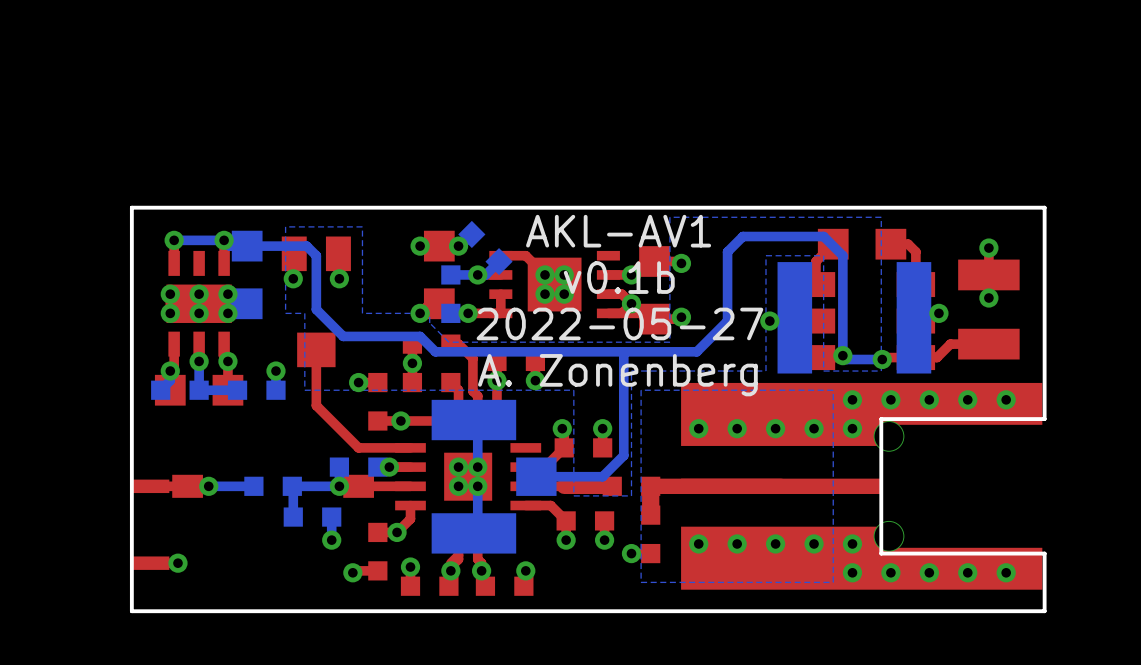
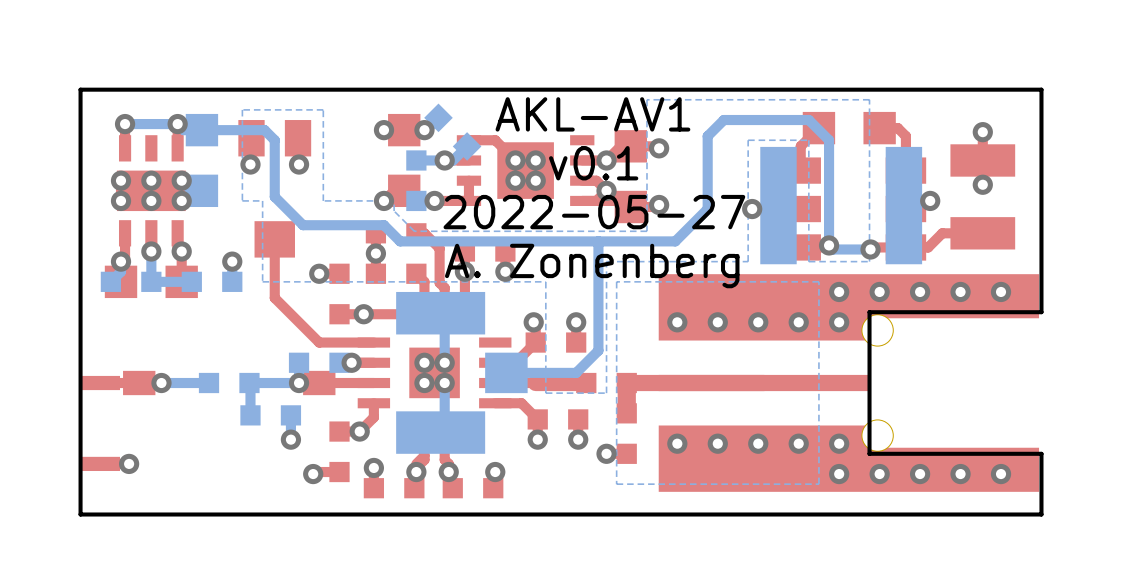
text: v0.1b (619, 277) -> v0.1 (593, 163)

